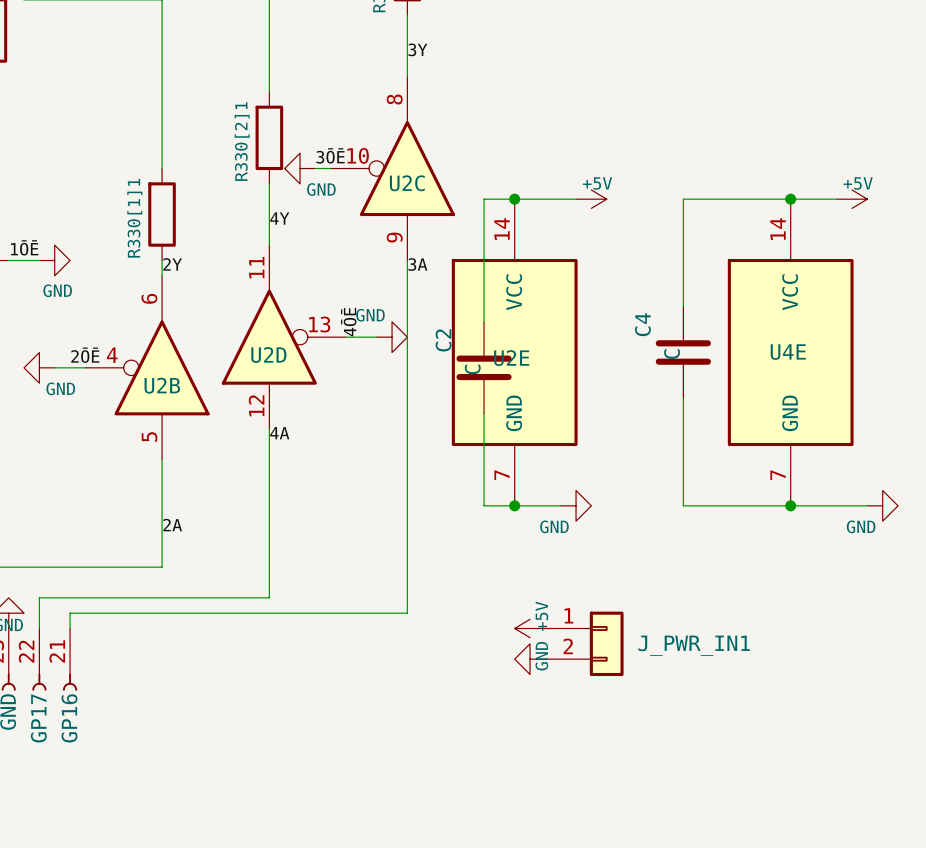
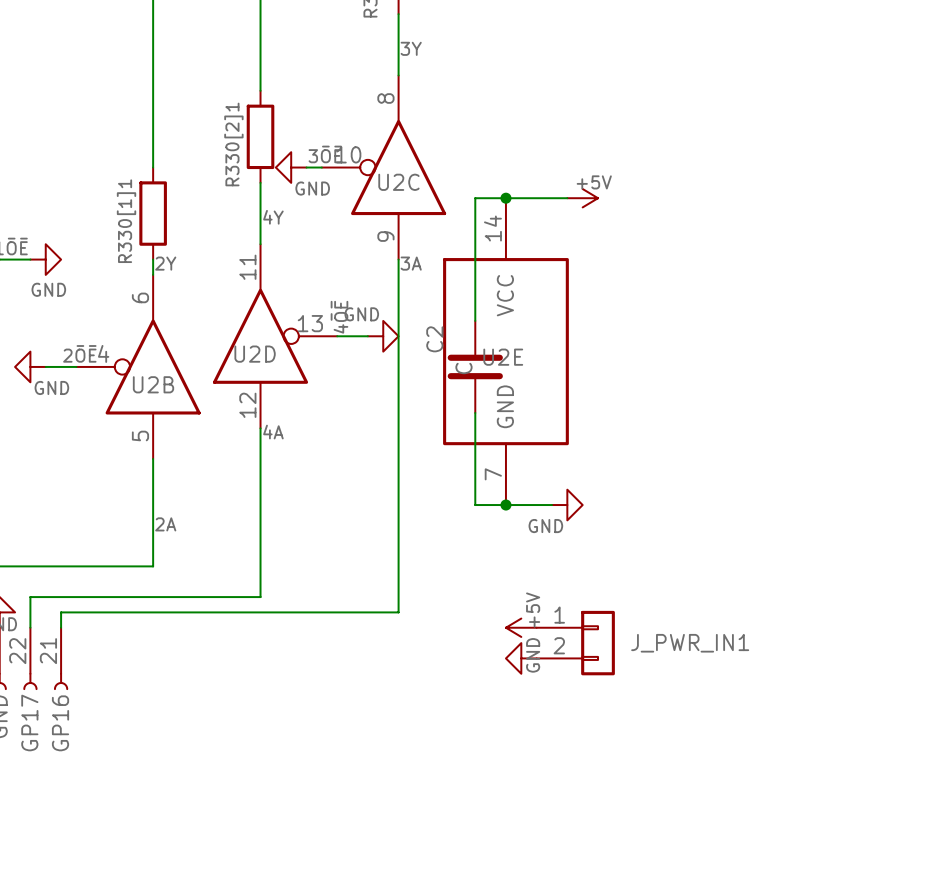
junction: (790, 199) -> none
wire: (836, 199) (683, 199) (683, 306) -> none
power symbol: +5V (852, 199) -> none
C4: C (683, 352) -> none
U4E: (790, 352) -> none
wire: (683, 398) (683, 505) (867, 505) -> none
junction: (790, 505) -> none
power symbol: GND (882, 505) -> none

